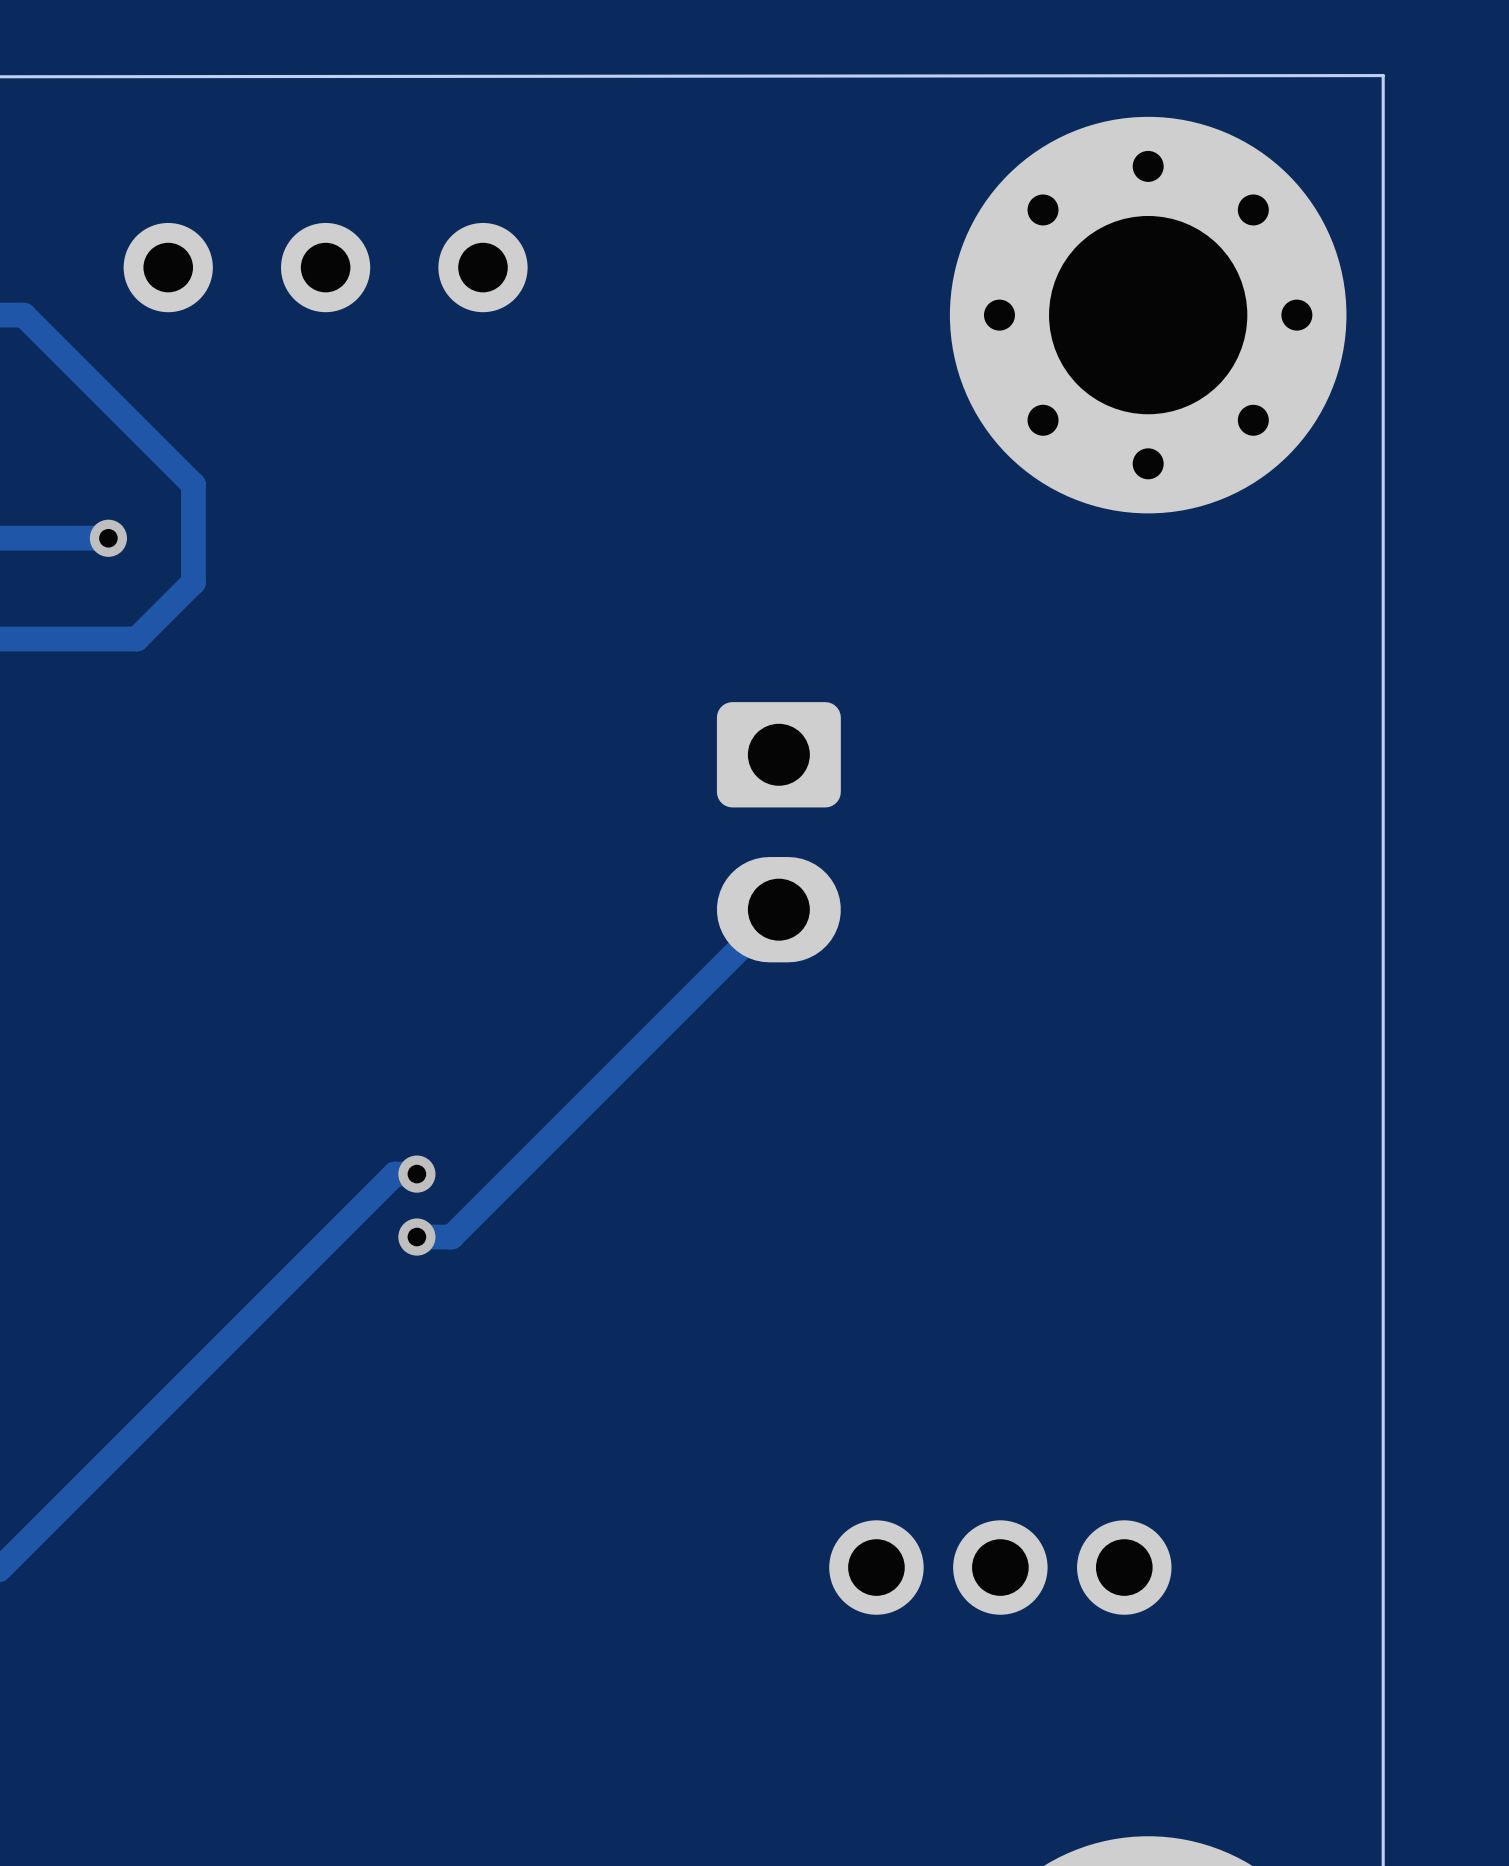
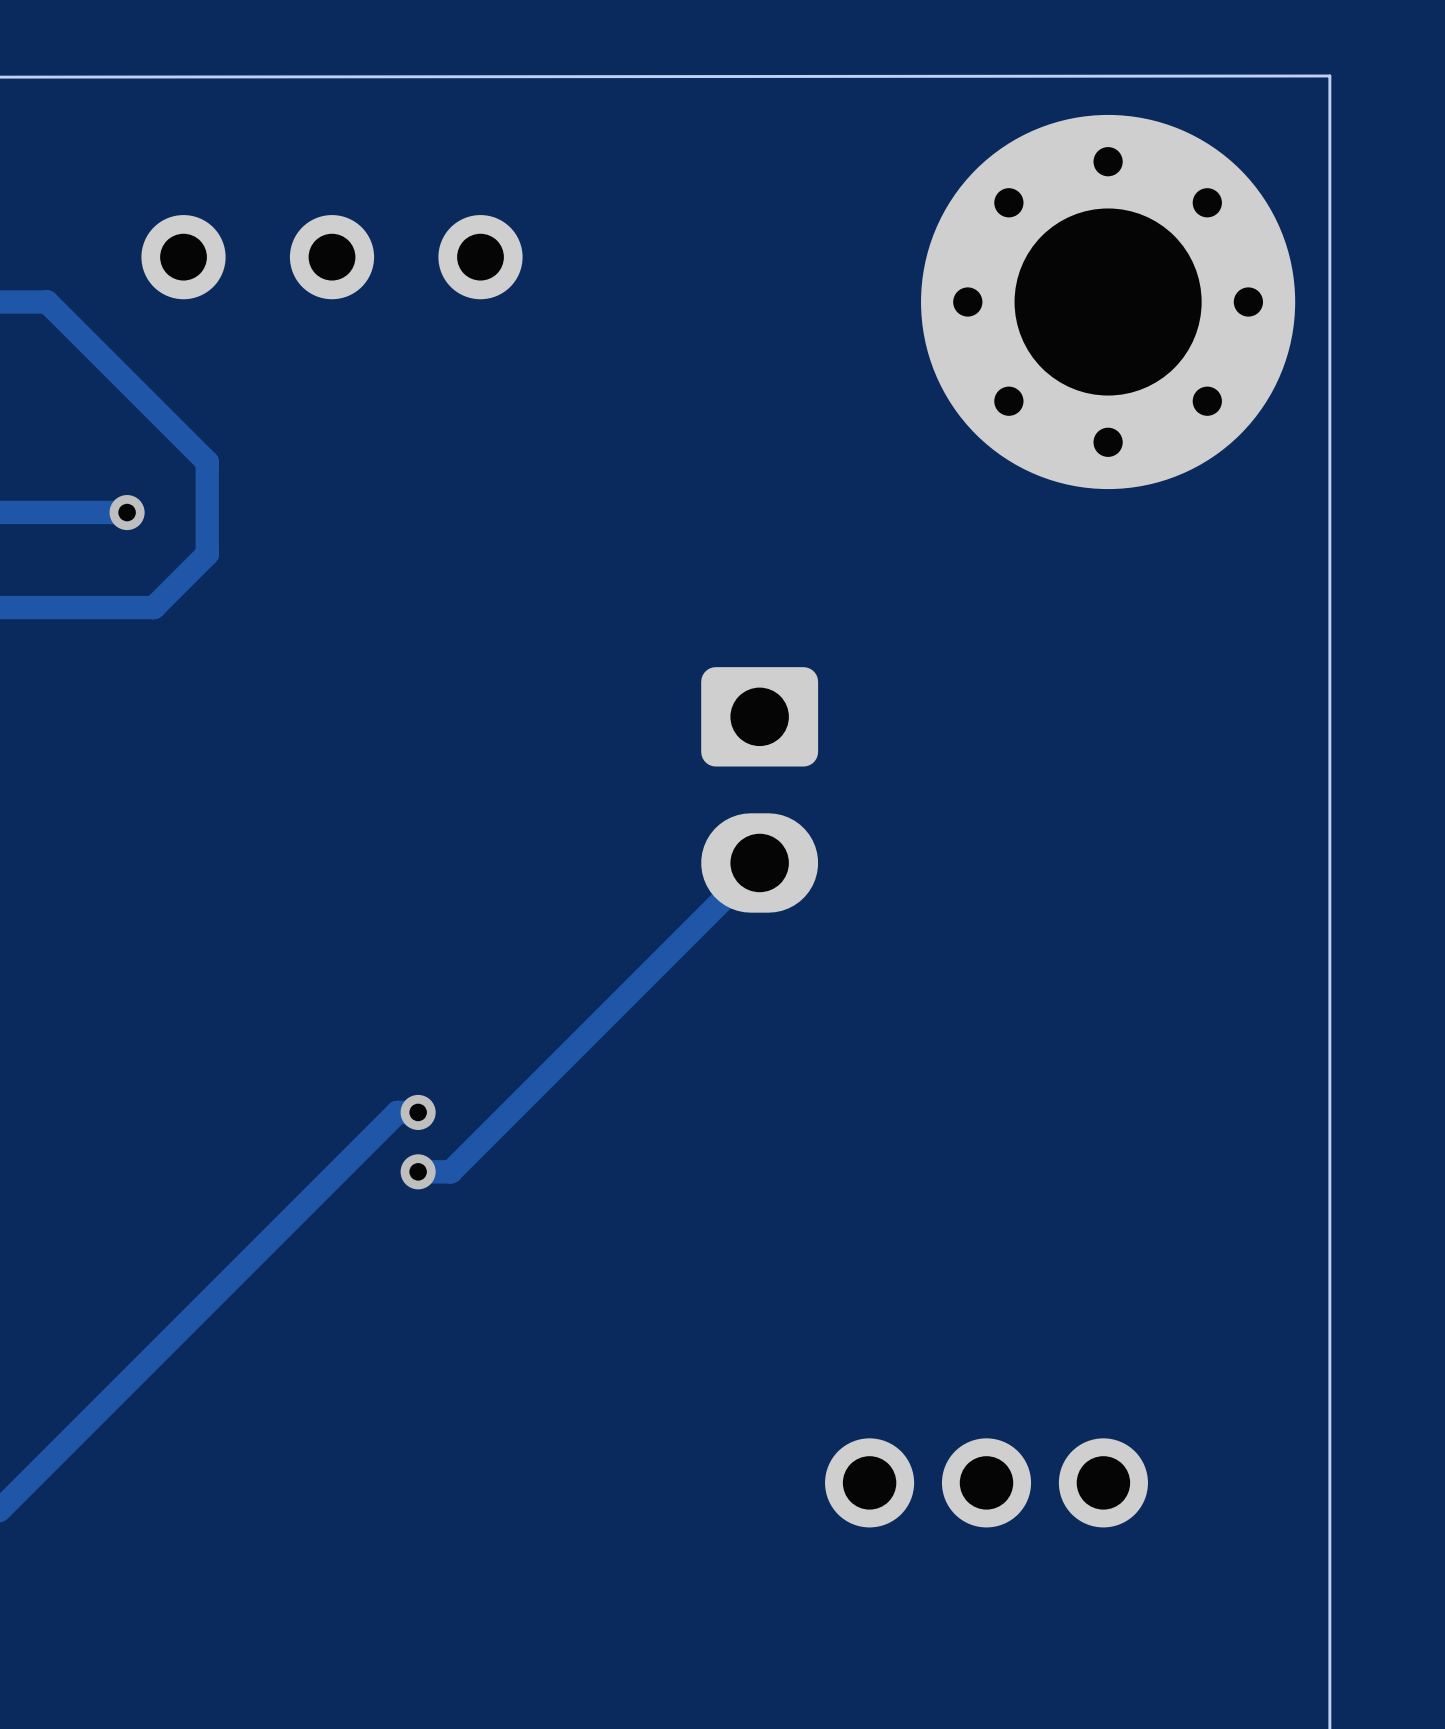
part position: (1000, 1567) -> (986, 1482)

